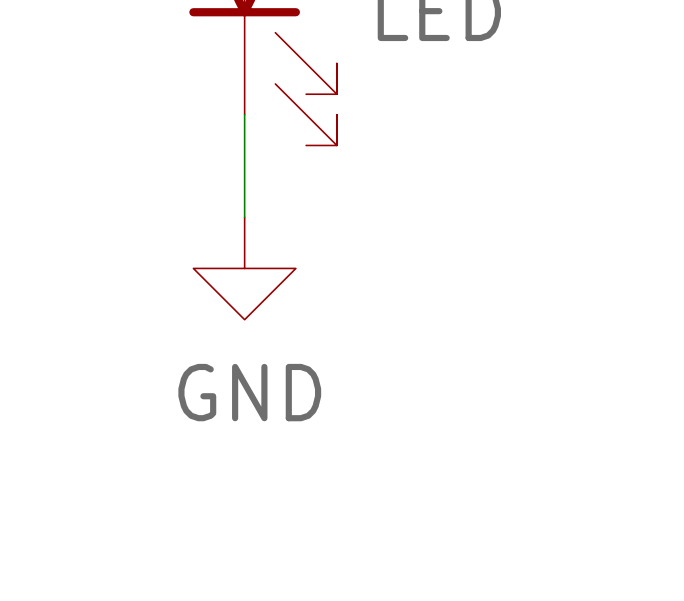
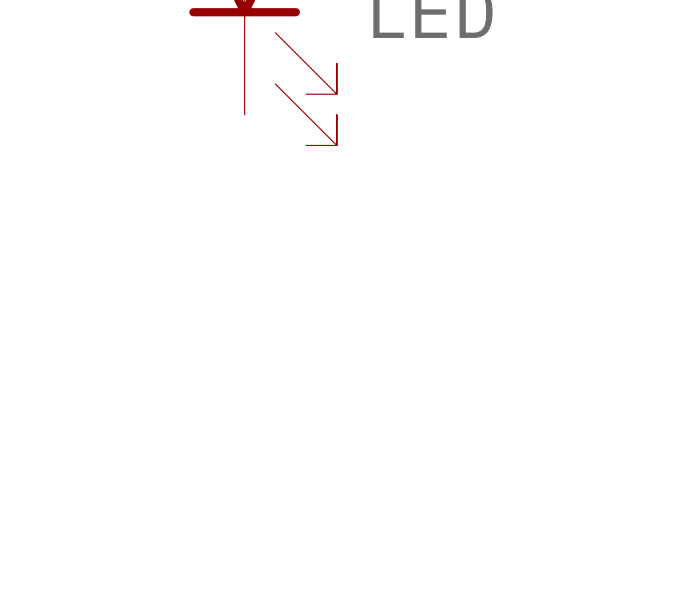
wire: (244, 114) (244, 217) -> none
power symbol: GND (244, 268) -> none

